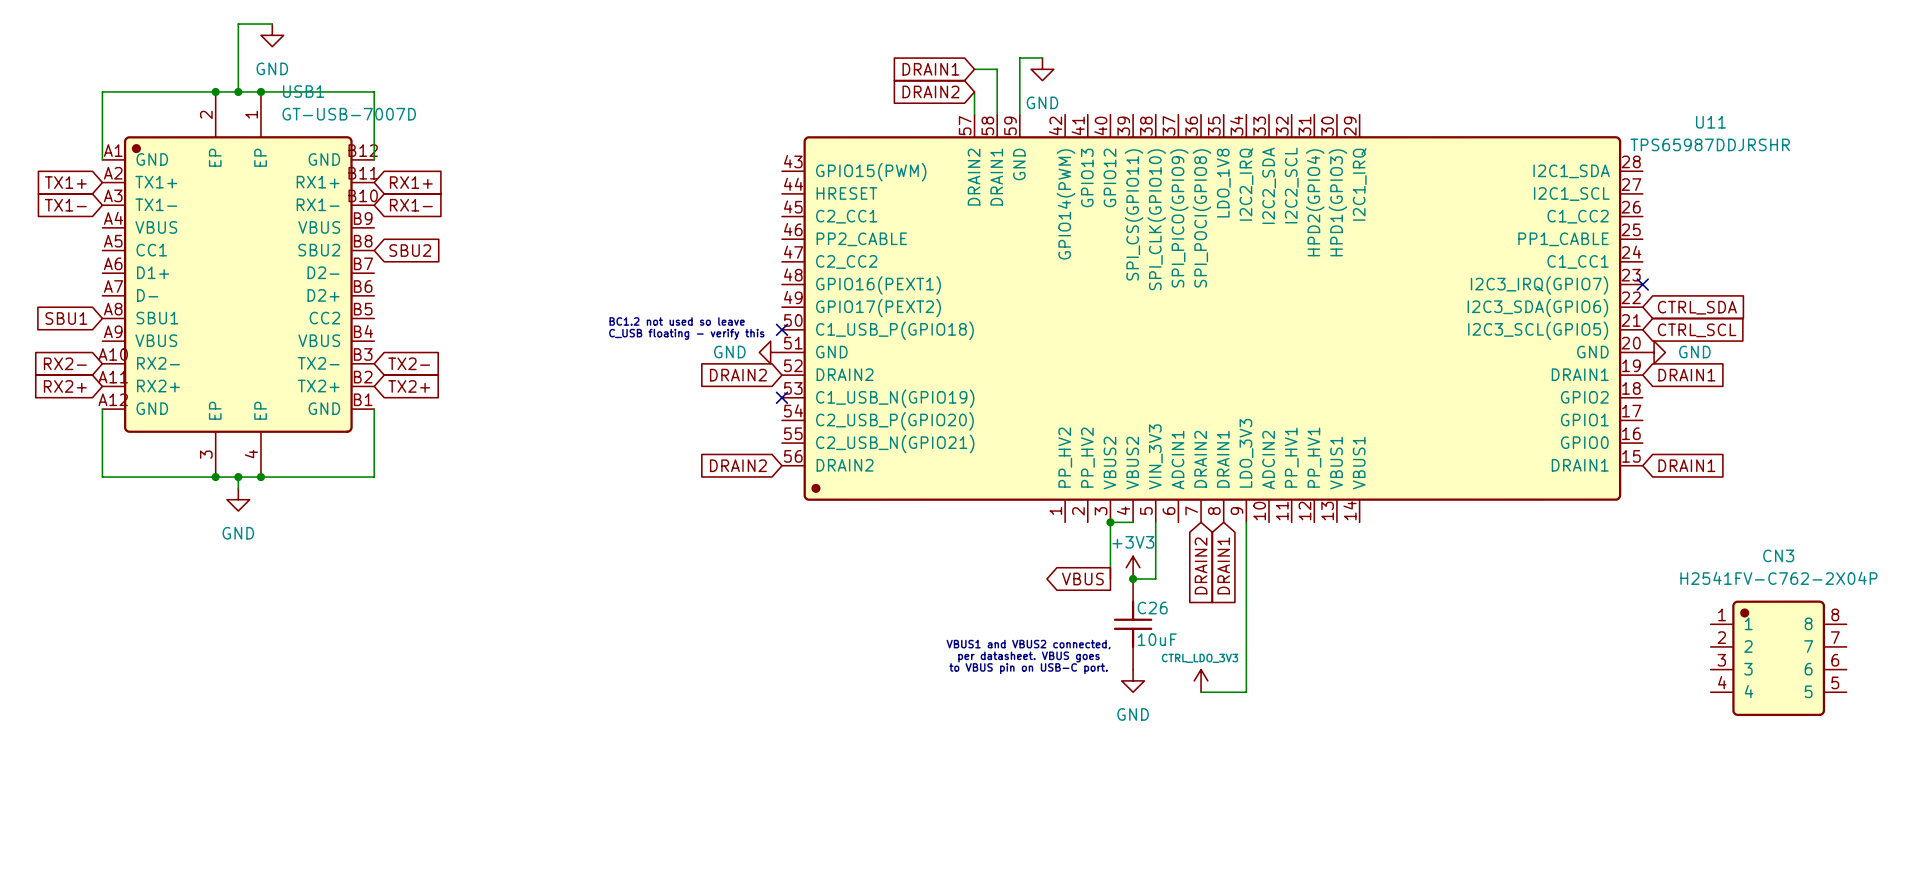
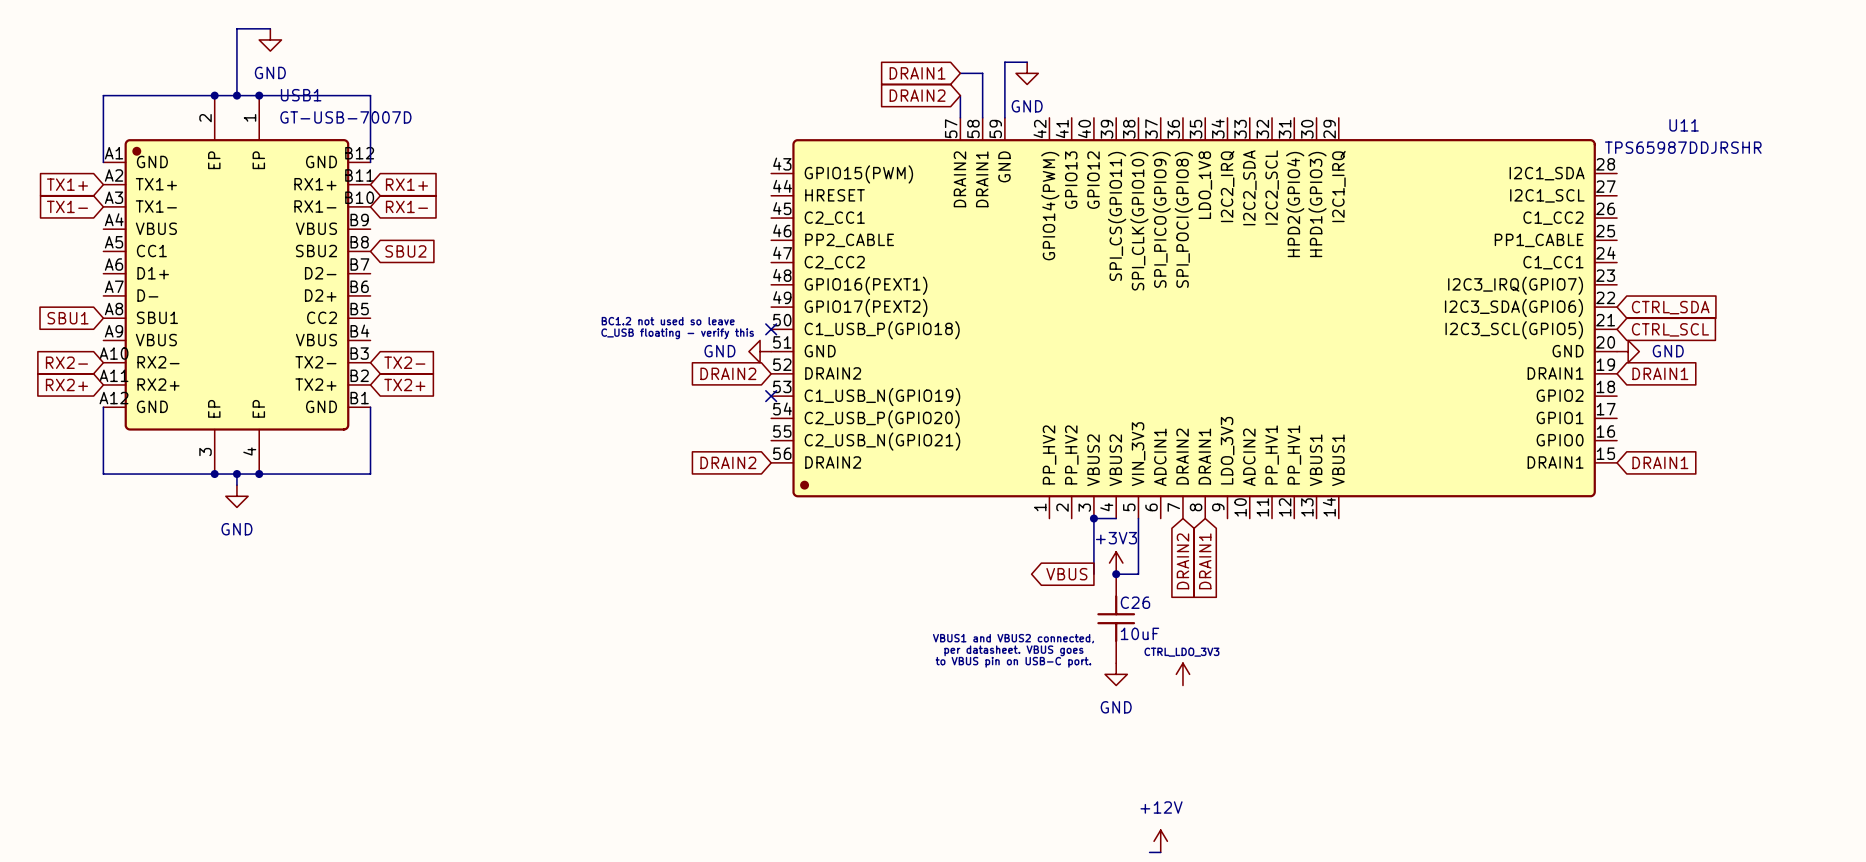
no-connect mark: (1642, 284) -> none
wire: (1246, 522) (1246, 692) (1201, 692) -> none
CN3: H2541FV-C762-2X04P (1778, 658) -> none
power symbol: none -> +12V (1160, 841)
wire: none -> (1149, 852) (1160, 852)

